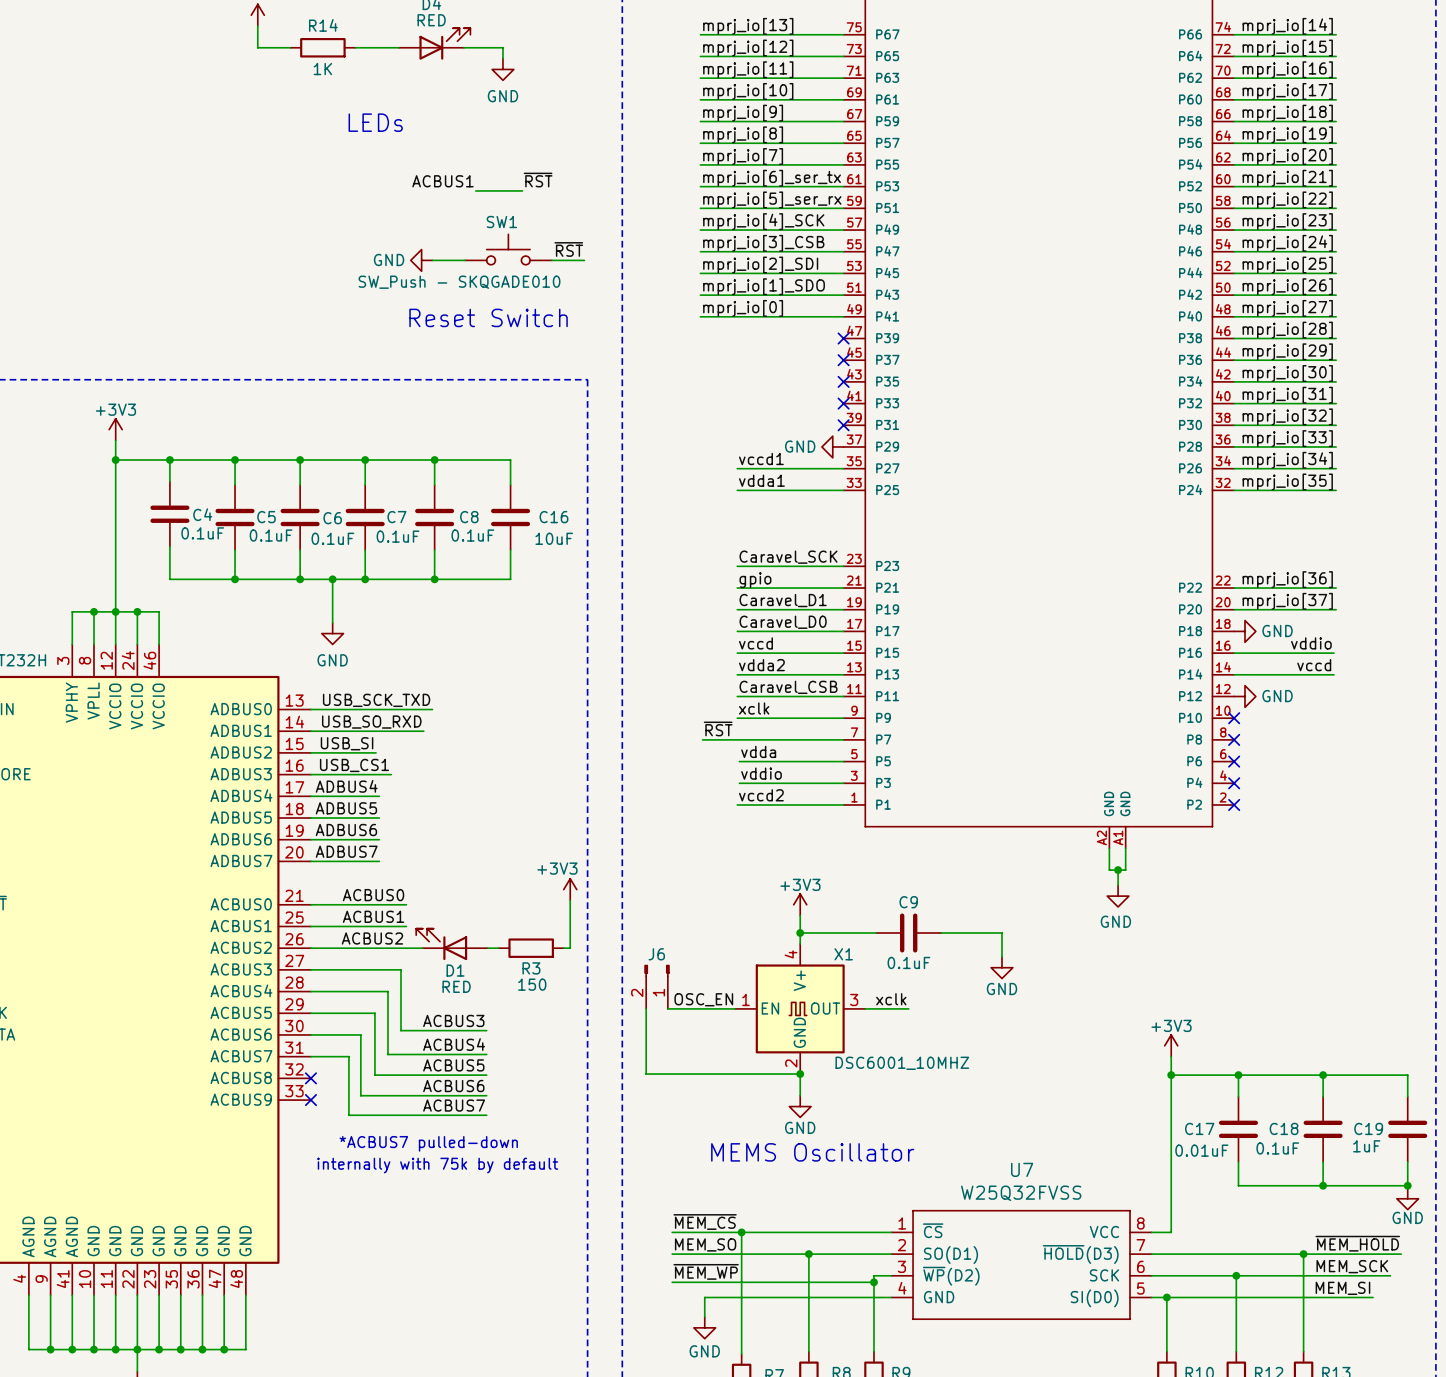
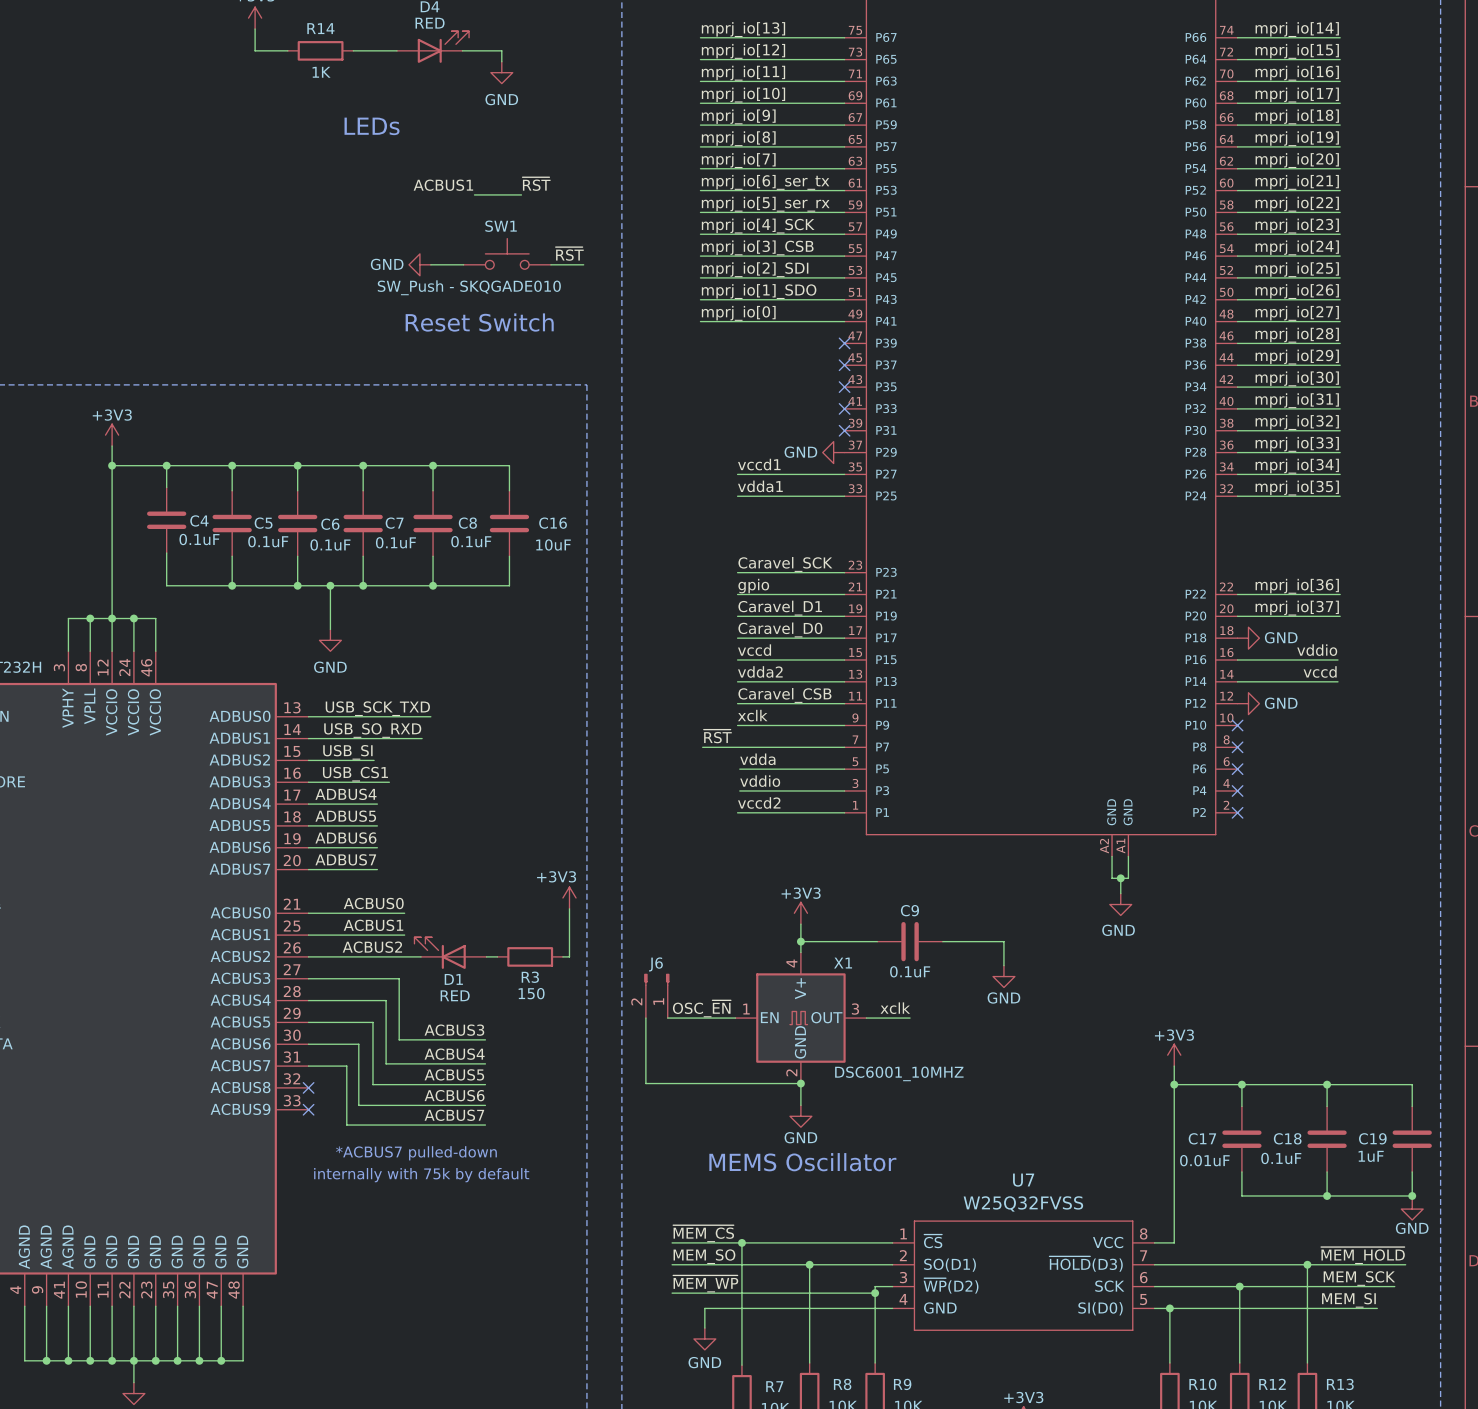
label: OSC_EN (703, 999) -> OSC_~{EN} (701, 1008)

